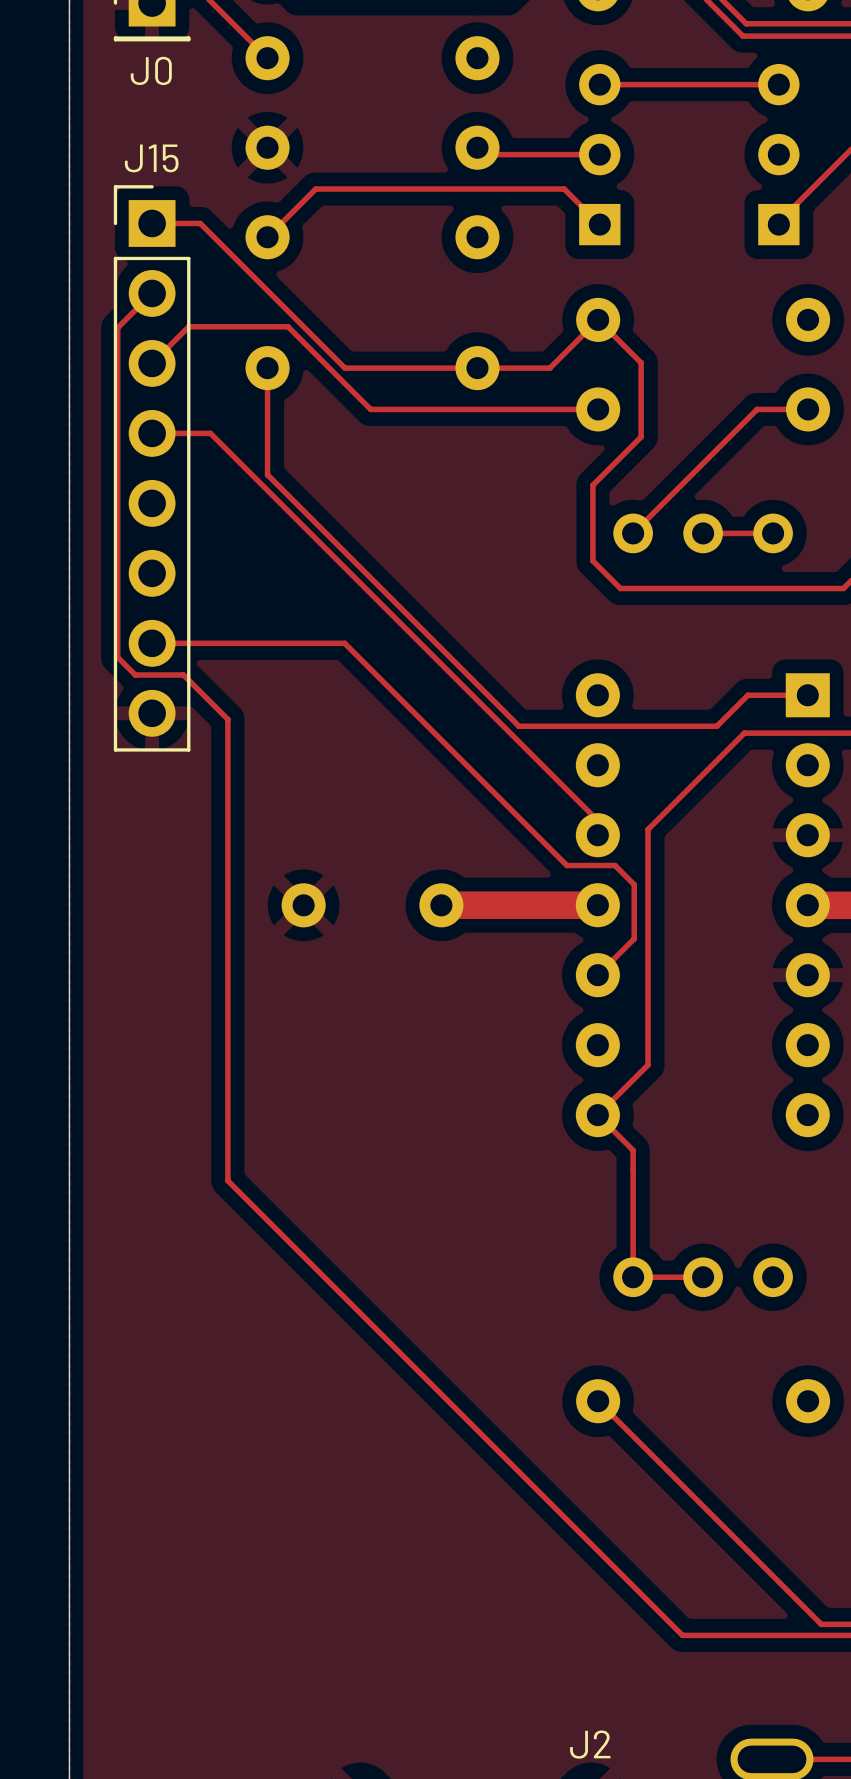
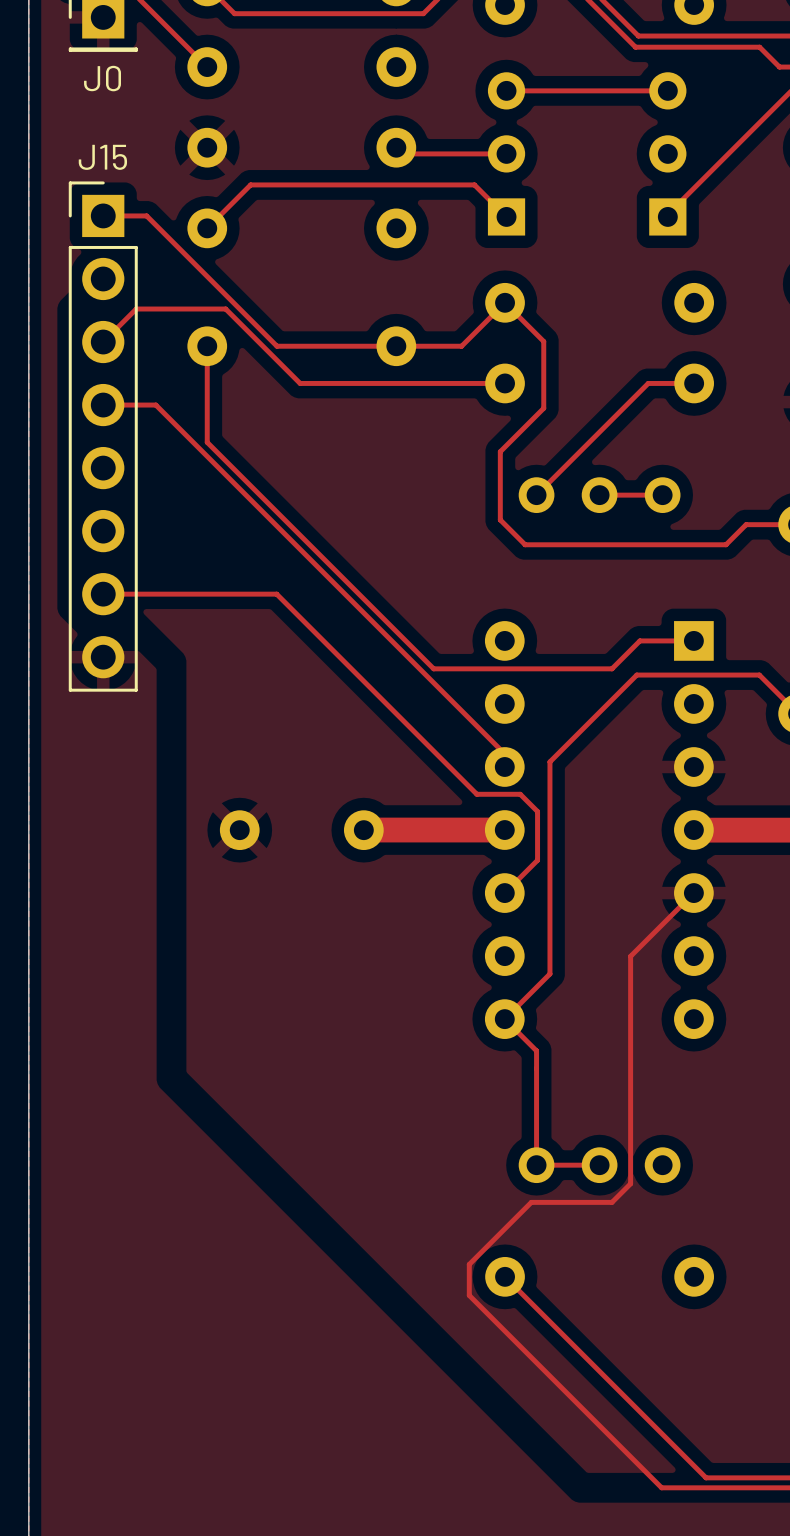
track: (152, 293) (117, 327) (117, 657) (135, 675) (183, 675) (227, 719) (227, 1180) (682, 1635) (772, 1635) -> (693, 893) (630, 956) (630, 1183) (612, 1202) (531, 1202) (469, 1264) (469, 1295) (661, 1487)

